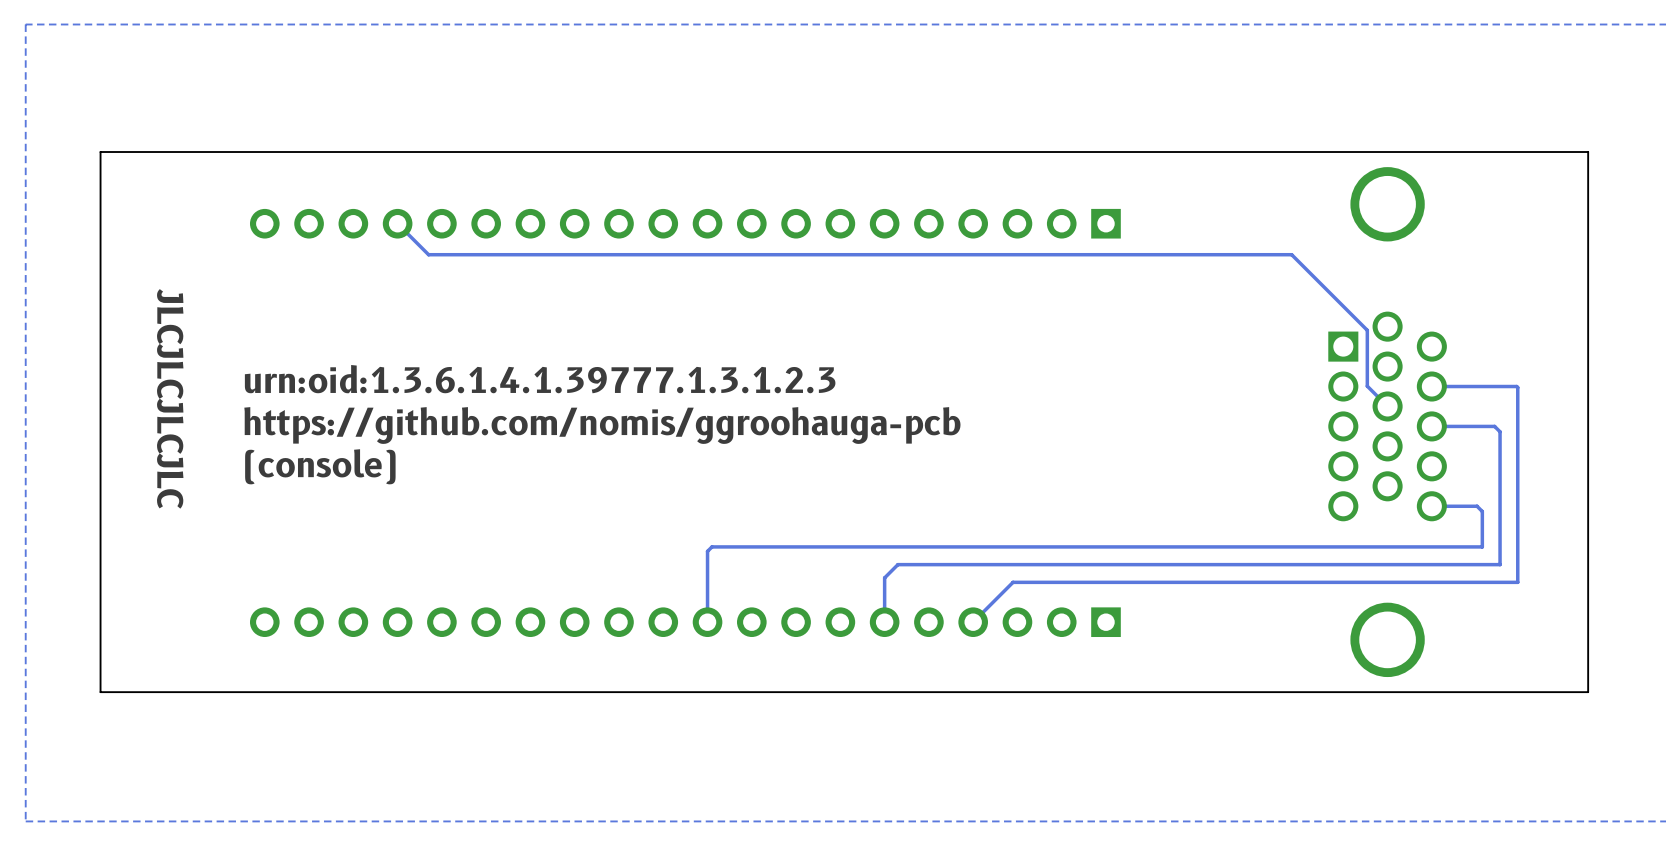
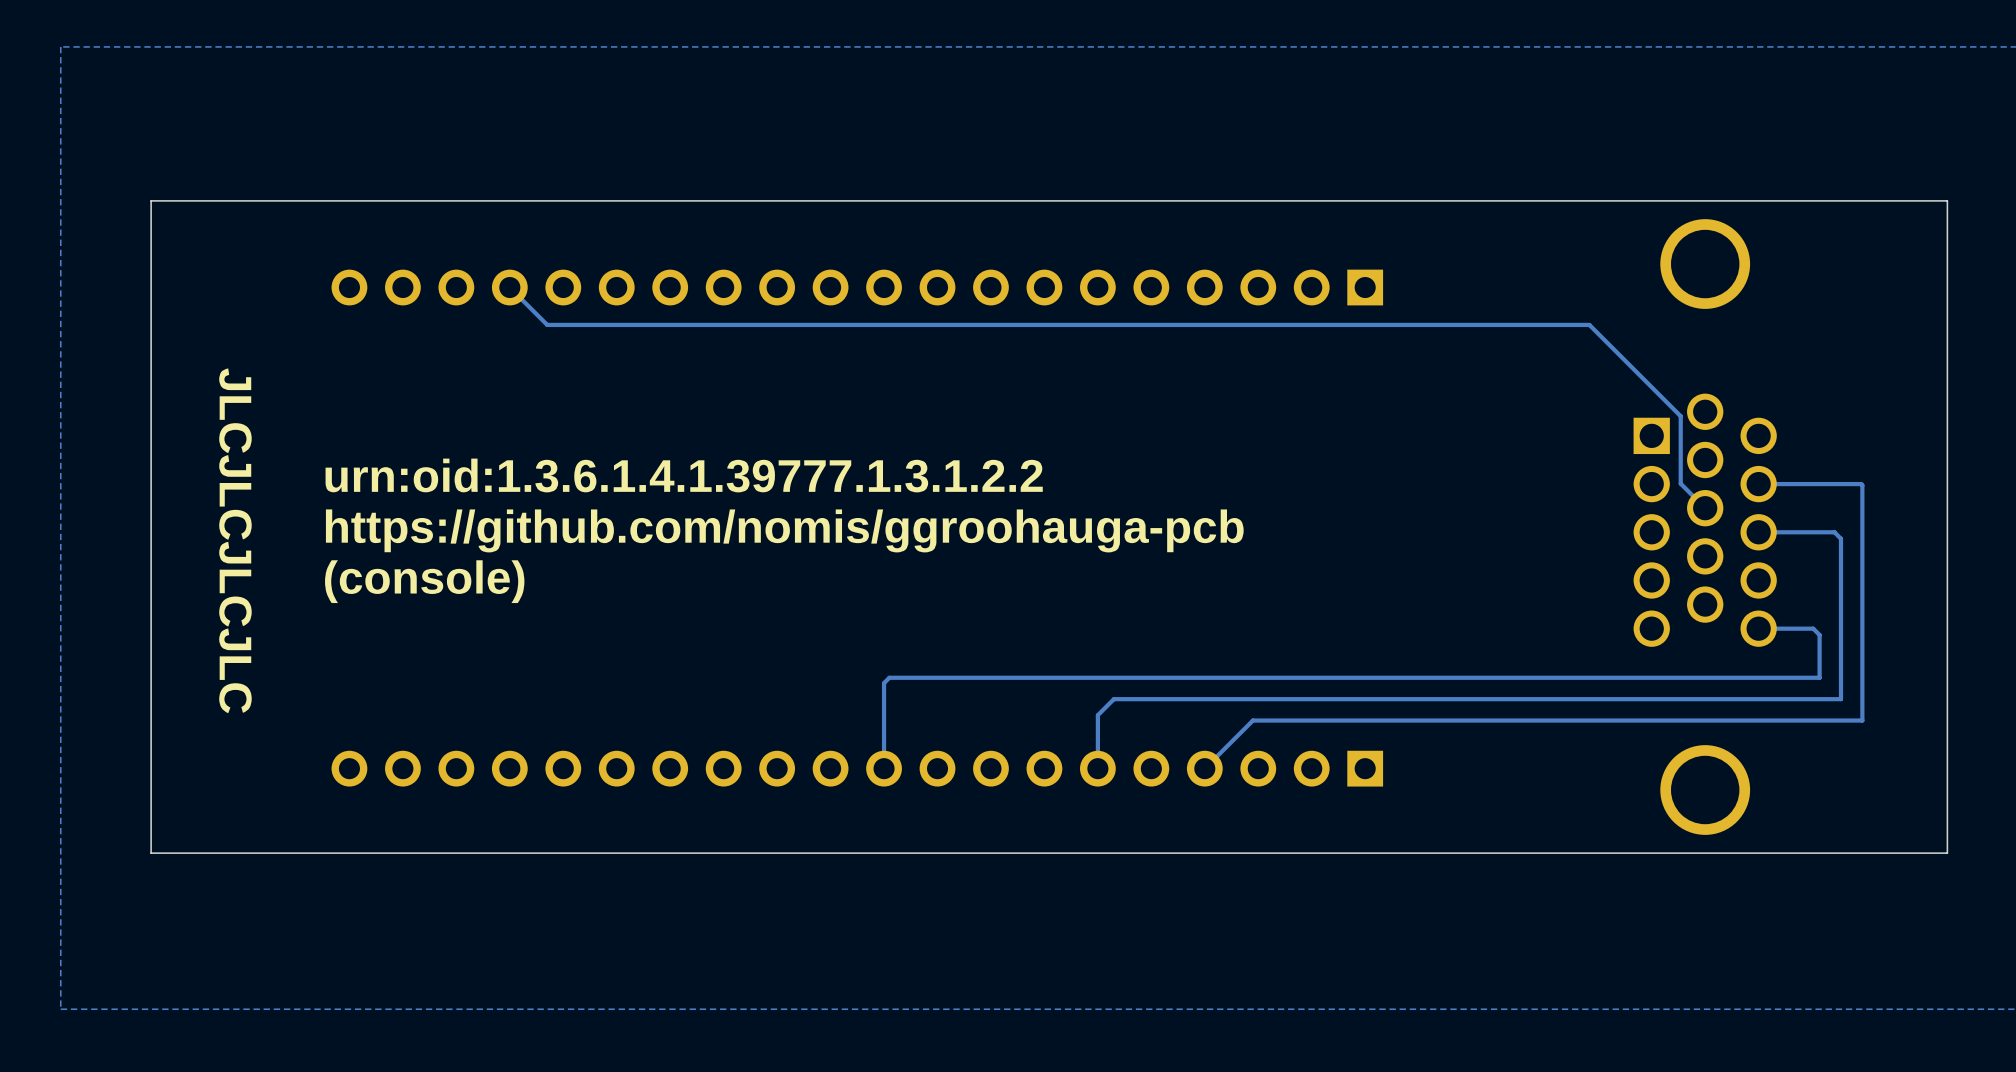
text: urn:oid:1.3.6.1.4.1.39777.1.3.1.2.3 (540, 379) -> urn:oid:1.3.6.1.4.1.39777.1.3.1.2.2 (684, 475)

